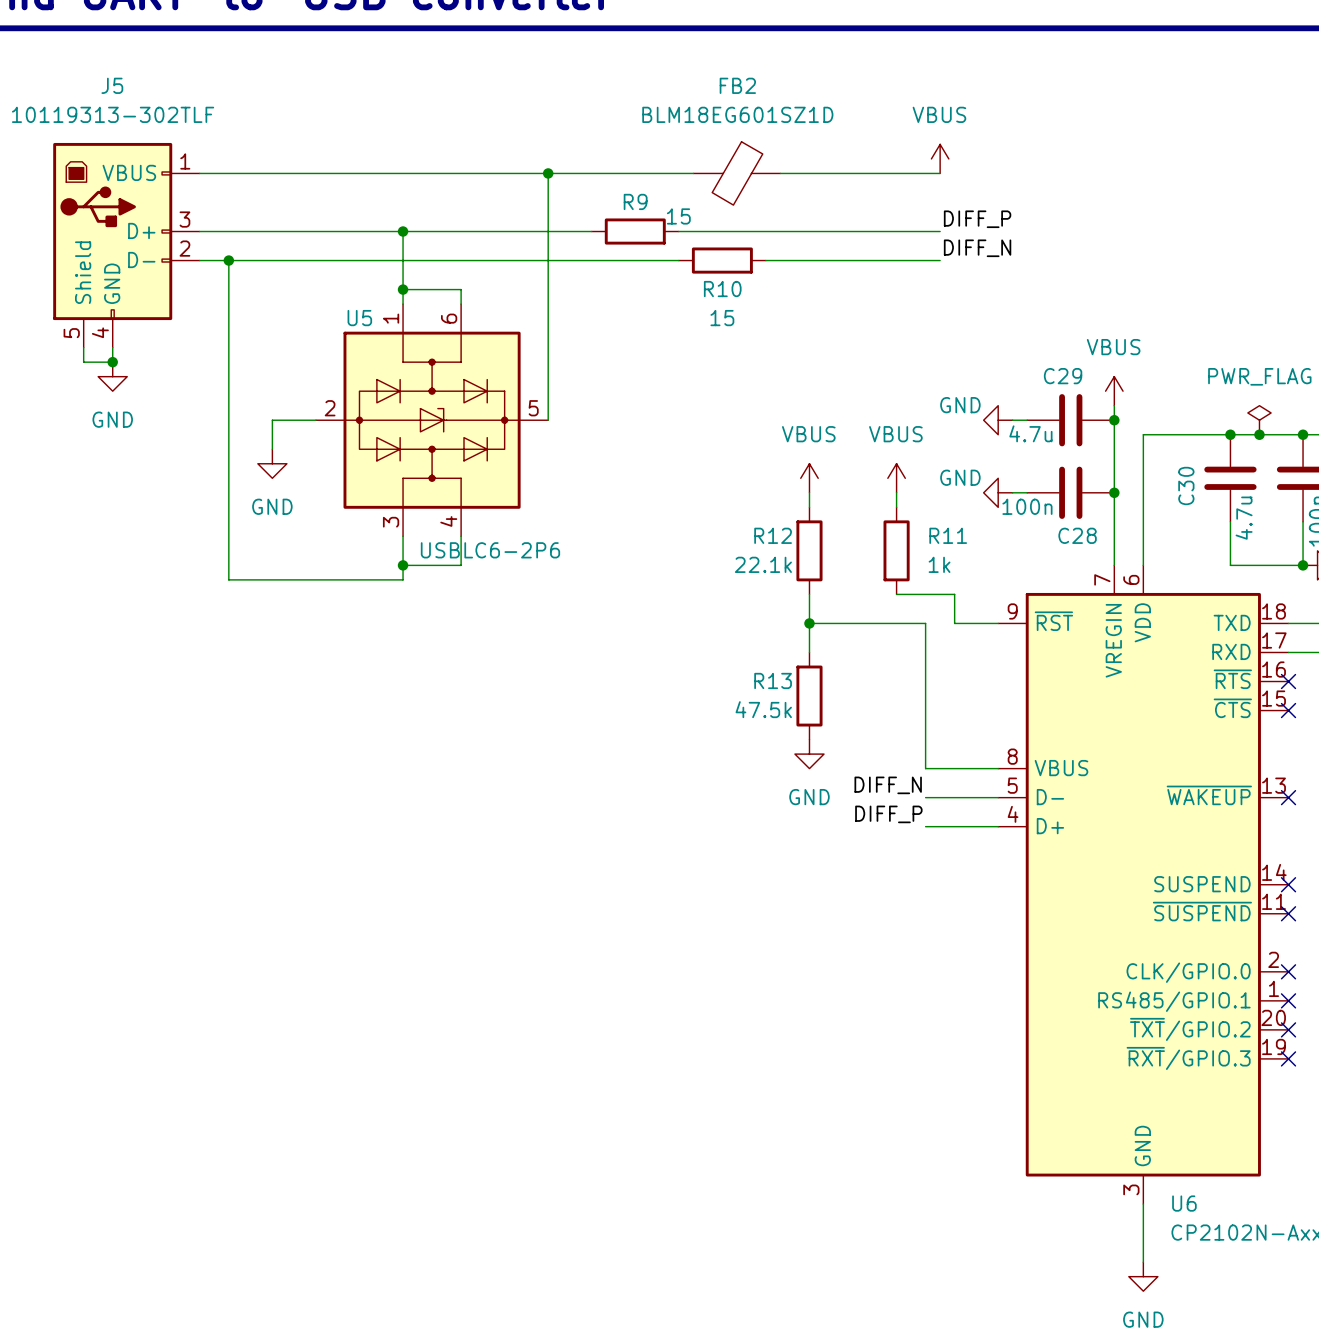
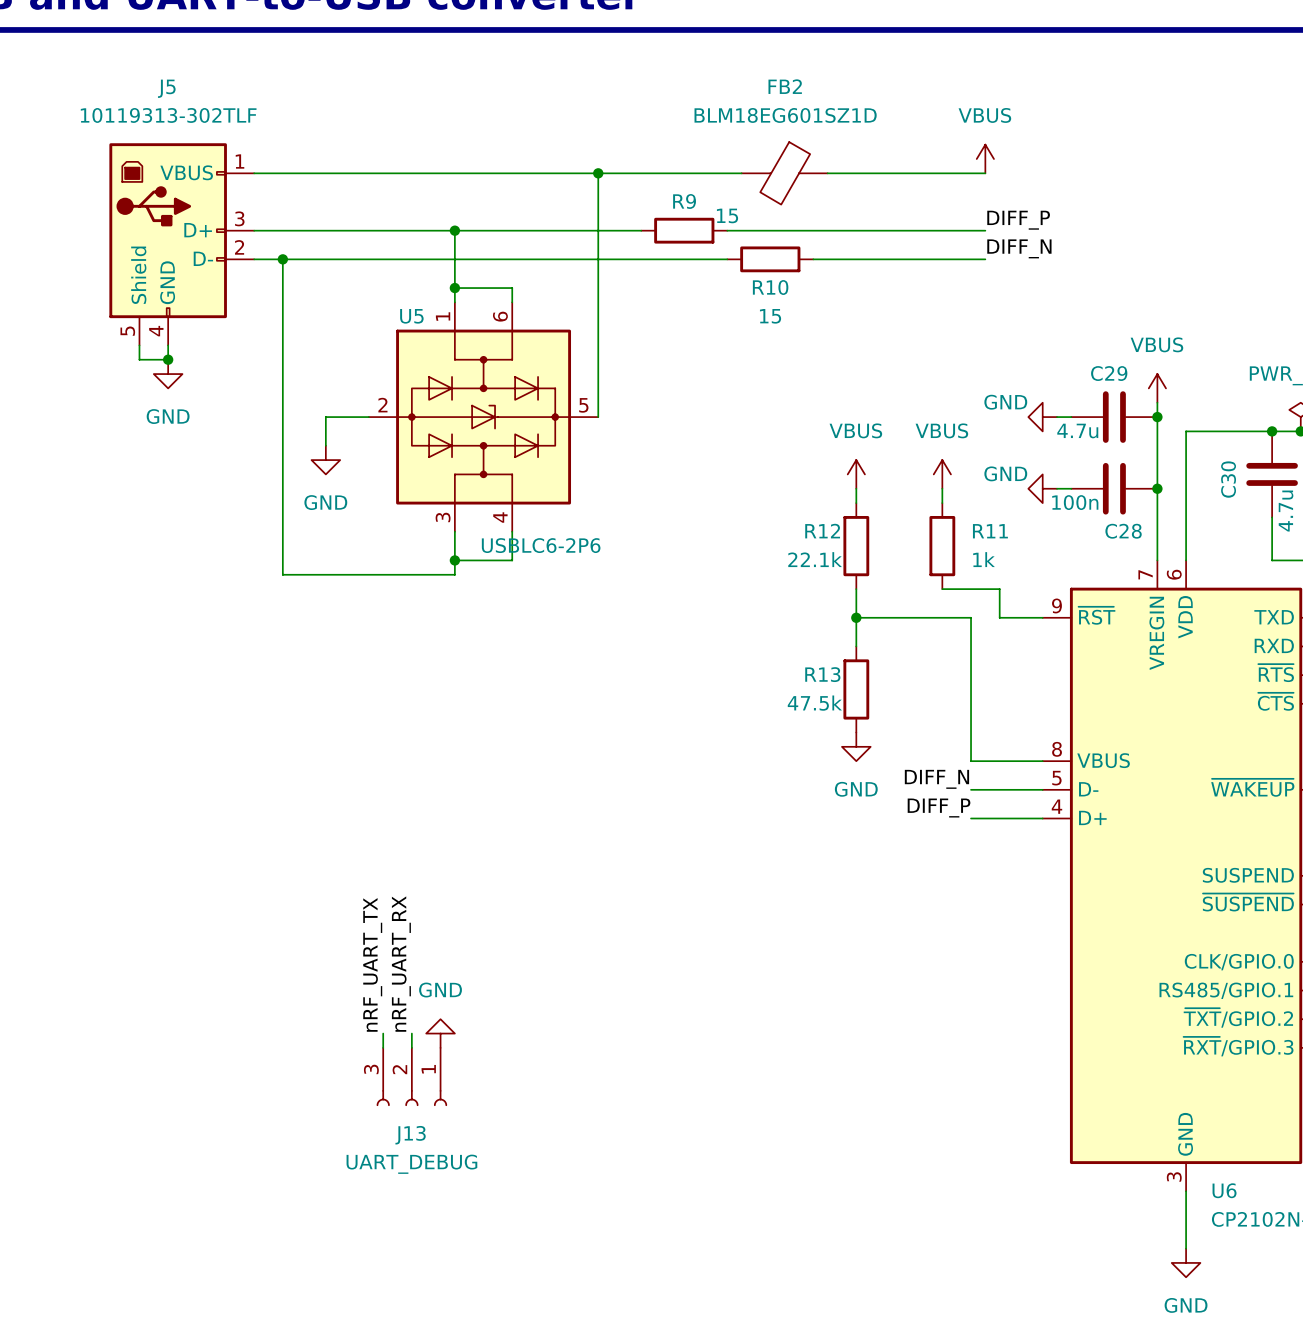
label: none -> nRF_UART_RX (401, 964)
label: none -> nRF_UART_TX (372, 964)
wire: none -> (383, 1033) (383, 1047)
wire: none -> (411, 1033) (411, 1047)
power symbol: none -> GND (440, 1033)
J13: none -> UART_DEBUG (411, 1077)

